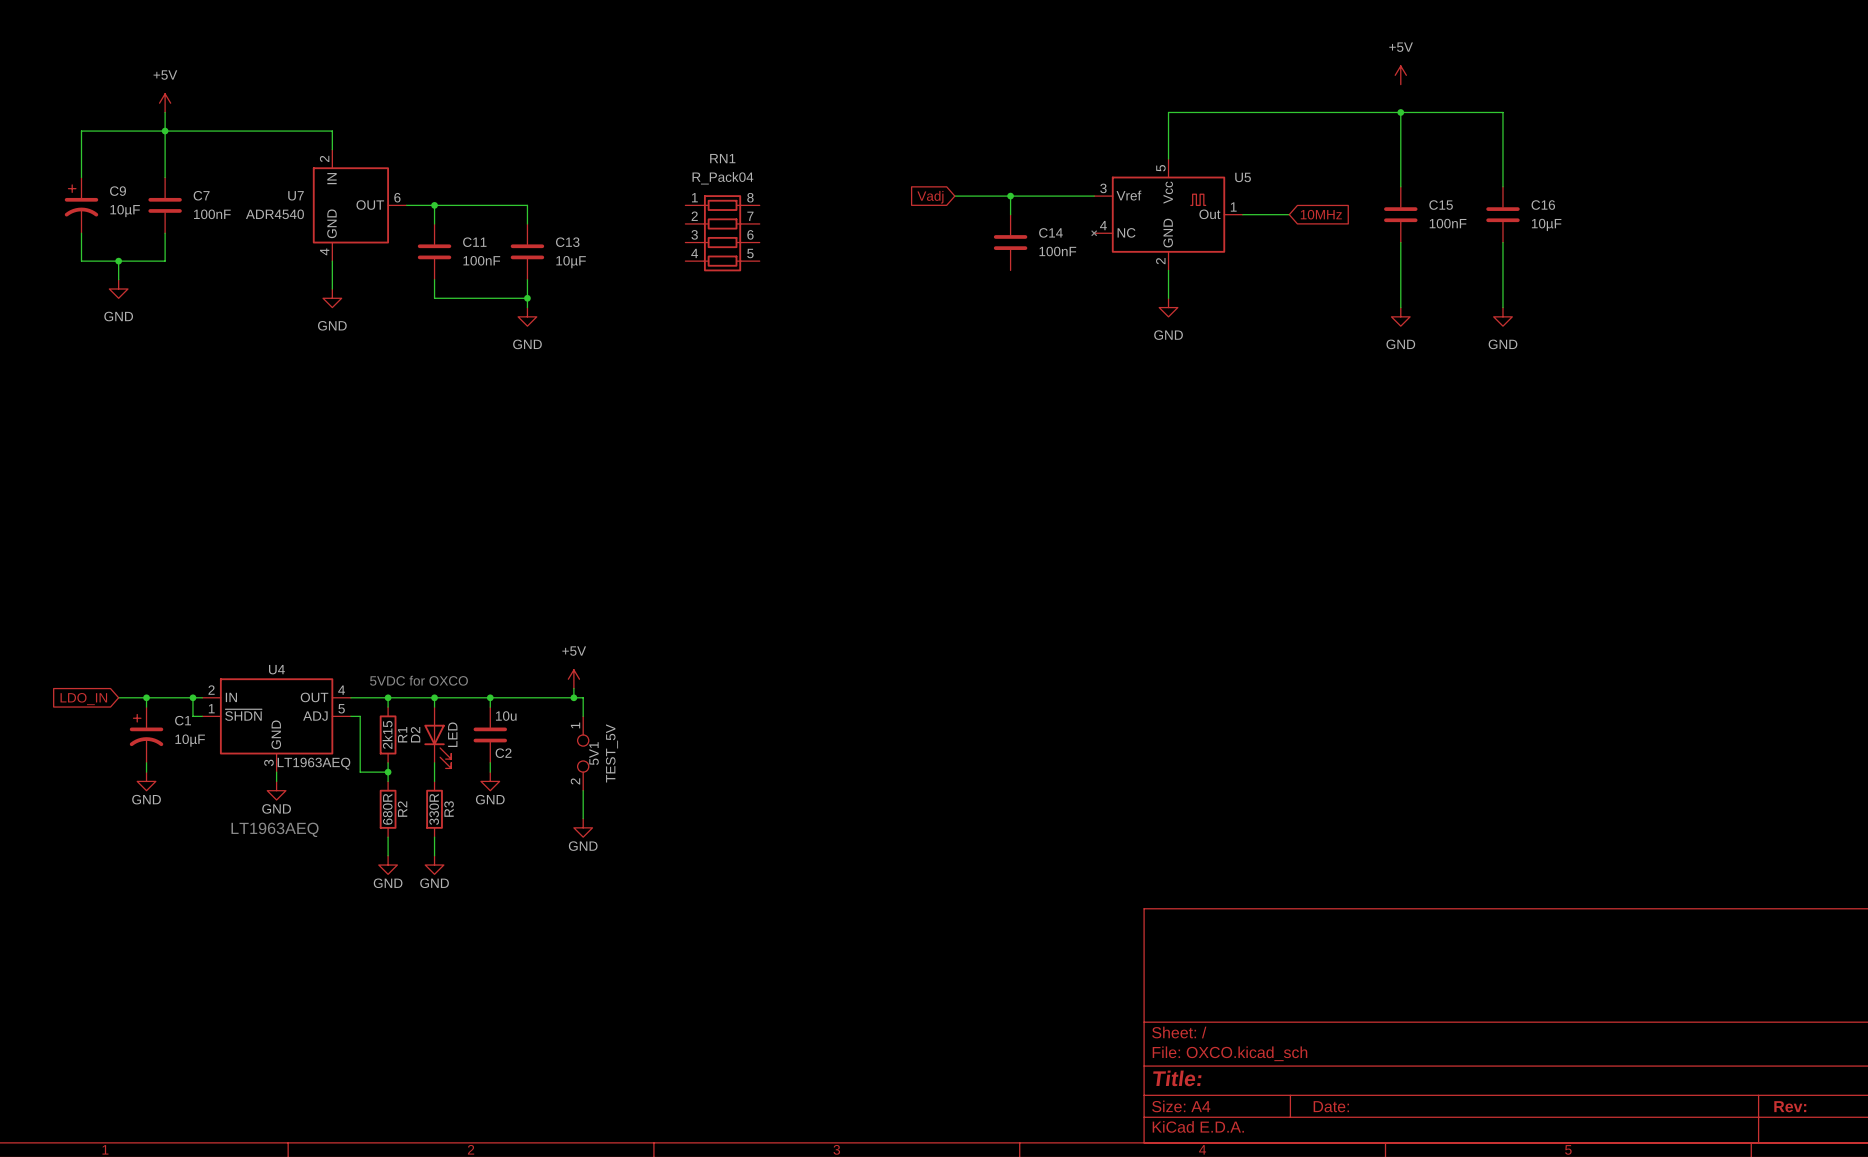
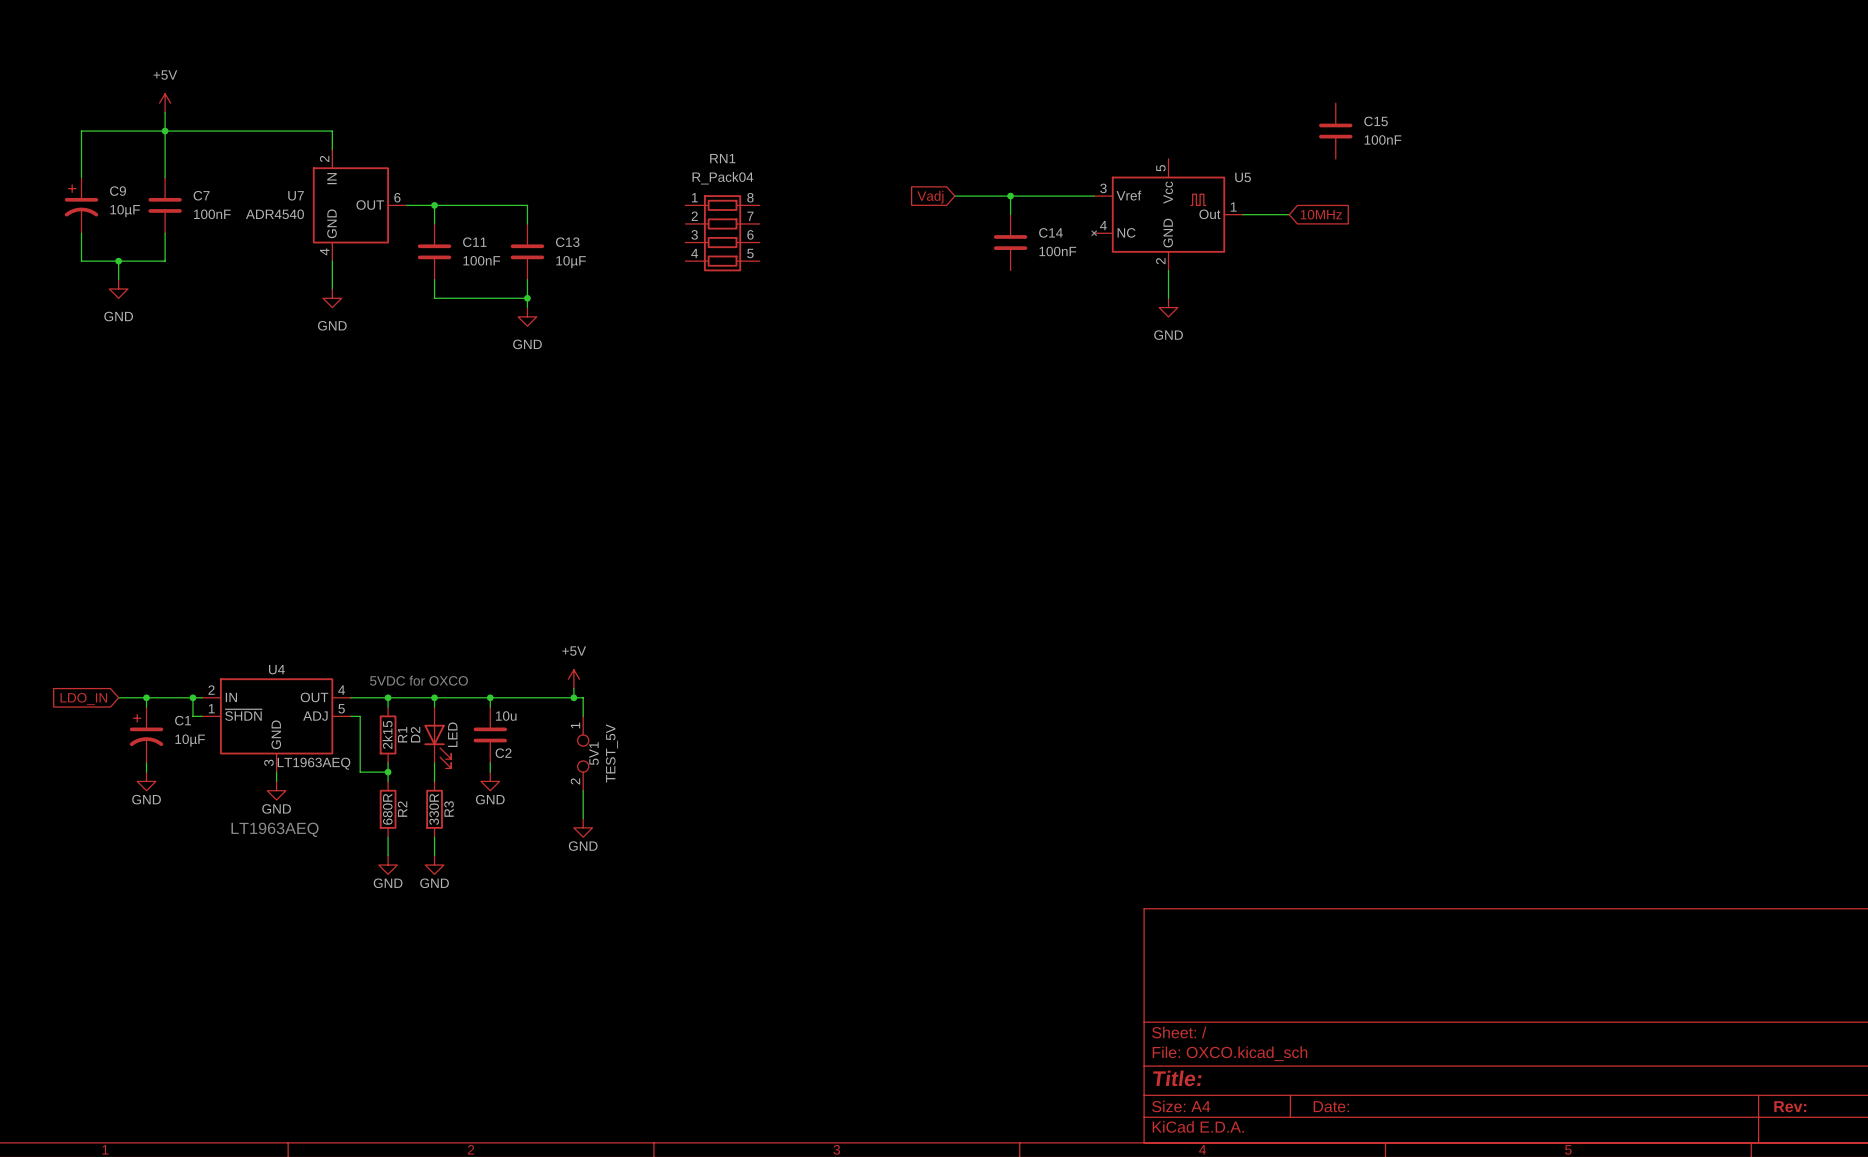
power symbol: +5V (1400, 75) -> none
wire: (1400, 112) (1400, 186) -> none
junction: (1400, 112) -> none
wire: (1168, 158) (1168, 112) (1502, 112) (1502, 186) -> none
C15 position: (1400, 214) -> (1335, 131)
C16: 10µF (1502, 214) -> none
wire: (1400, 242) (1400, 307) -> none
wire: (1502, 242) (1502, 307) -> none
power symbol: GND (1400, 316) -> none
power symbol: GND (1502, 316) -> none

